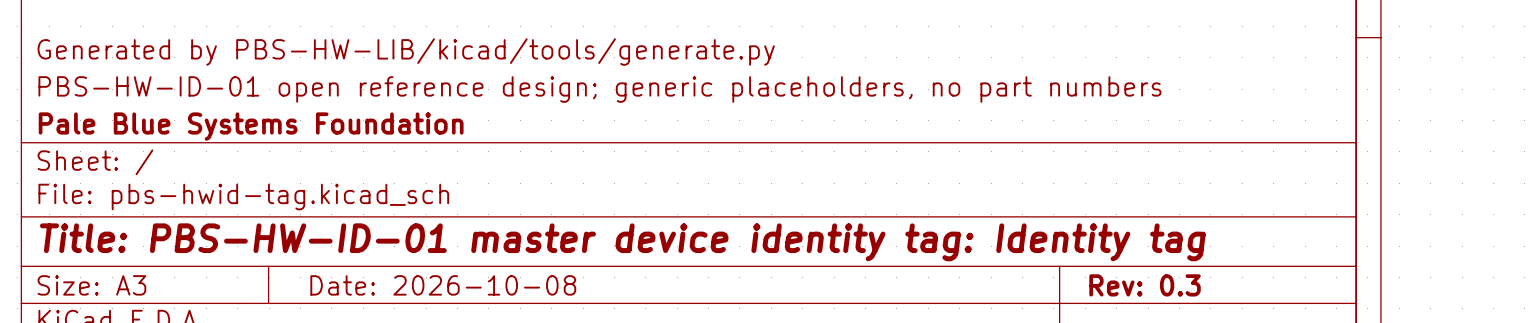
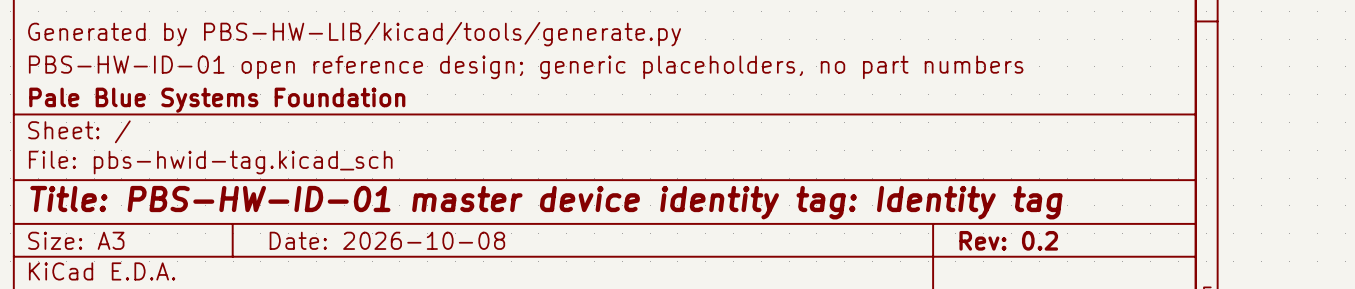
title block: Rev: 0.3 (1145, 285) -> Rev: 0.2 (1008, 240)

